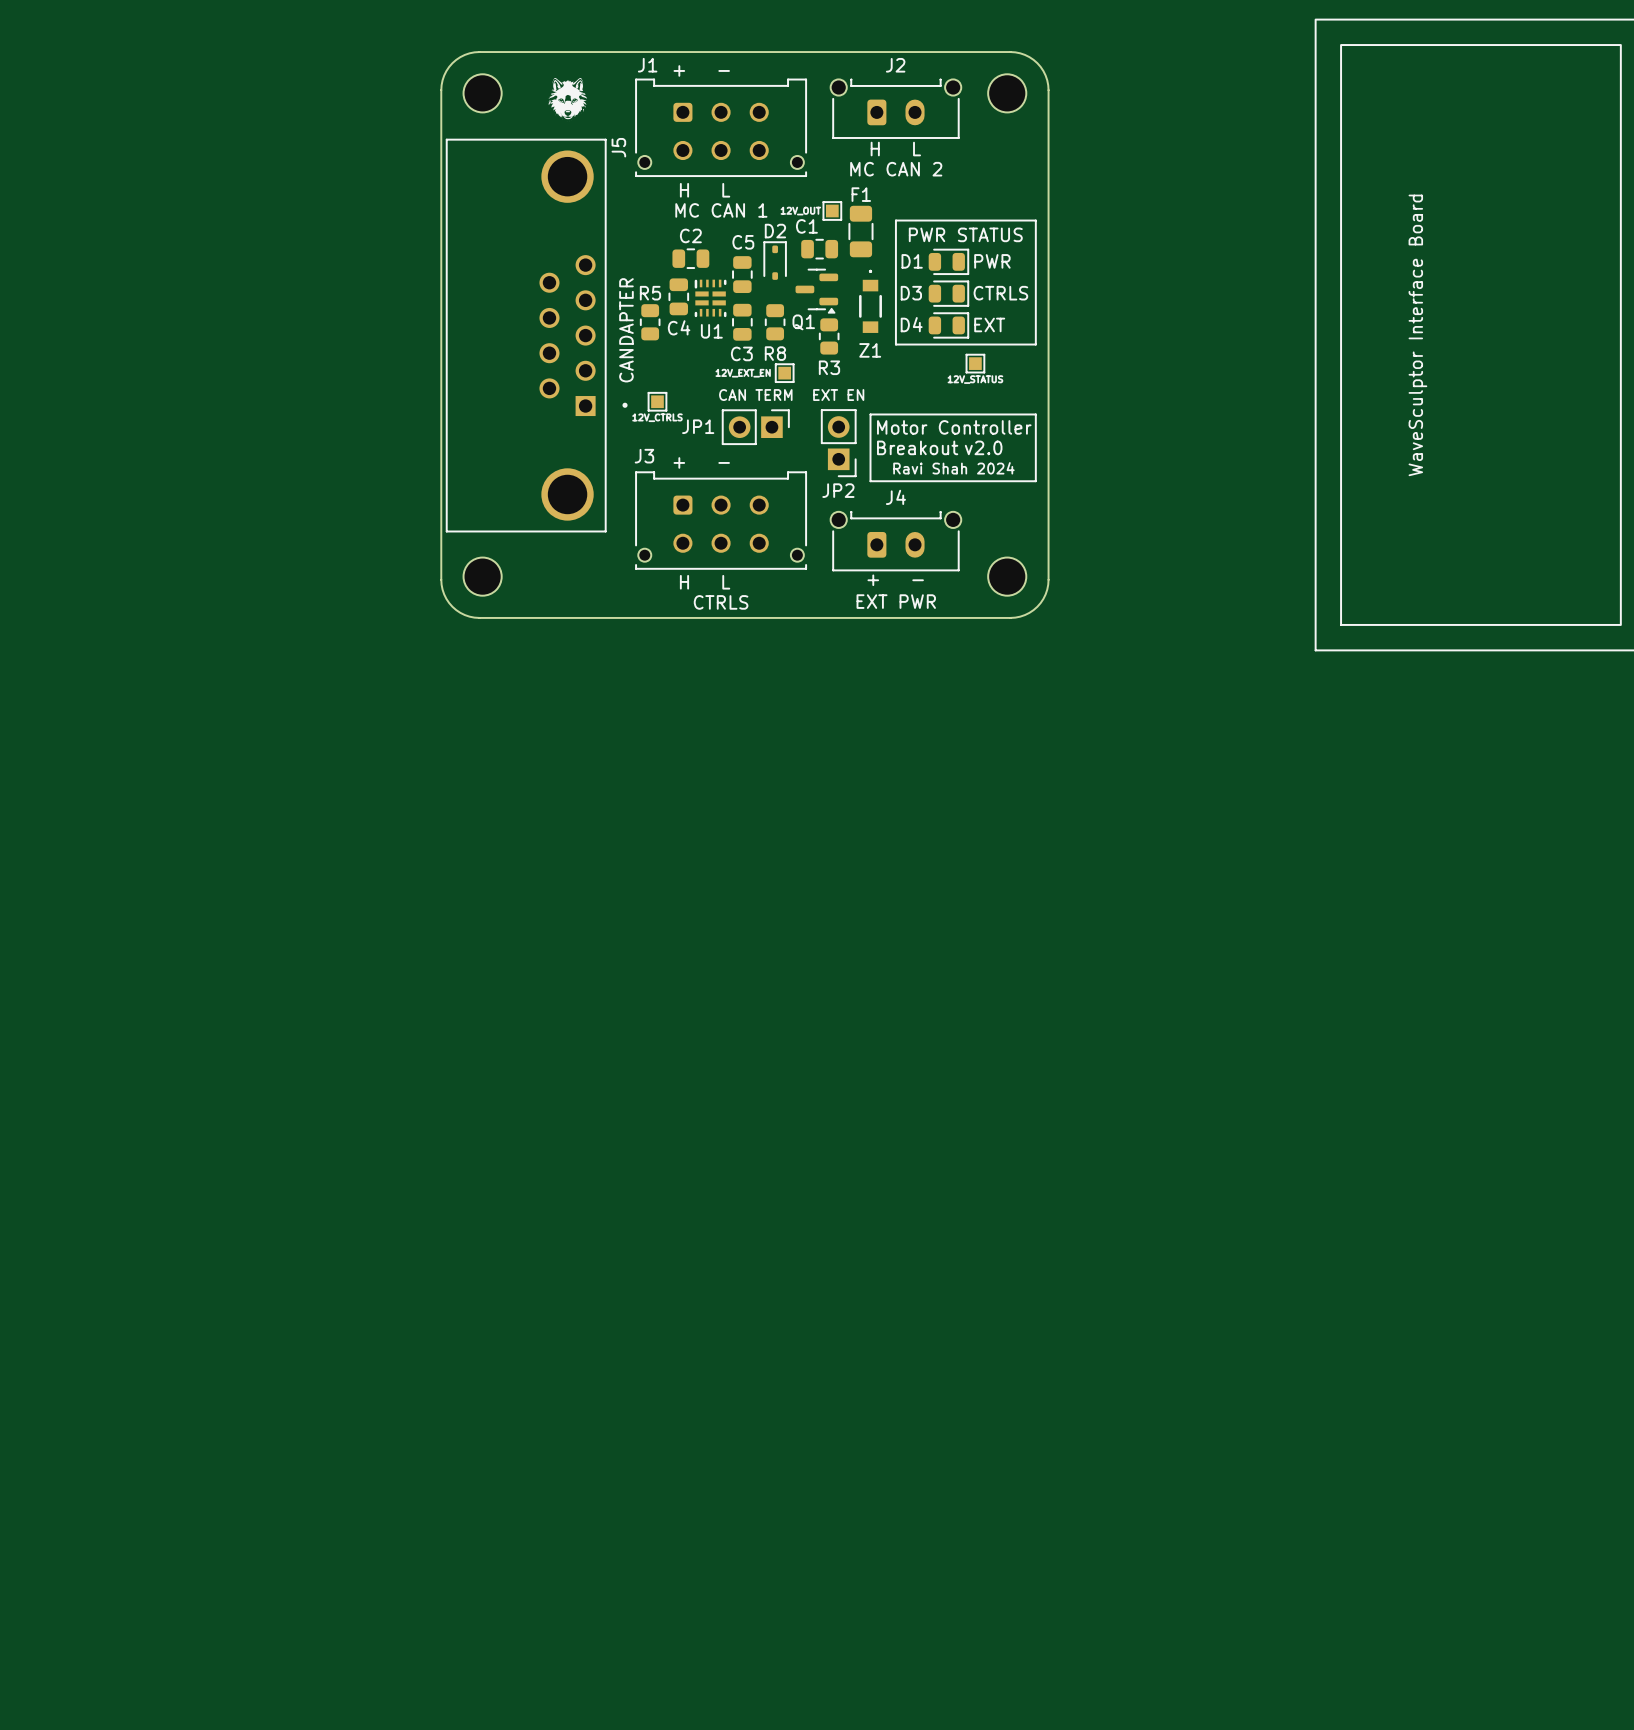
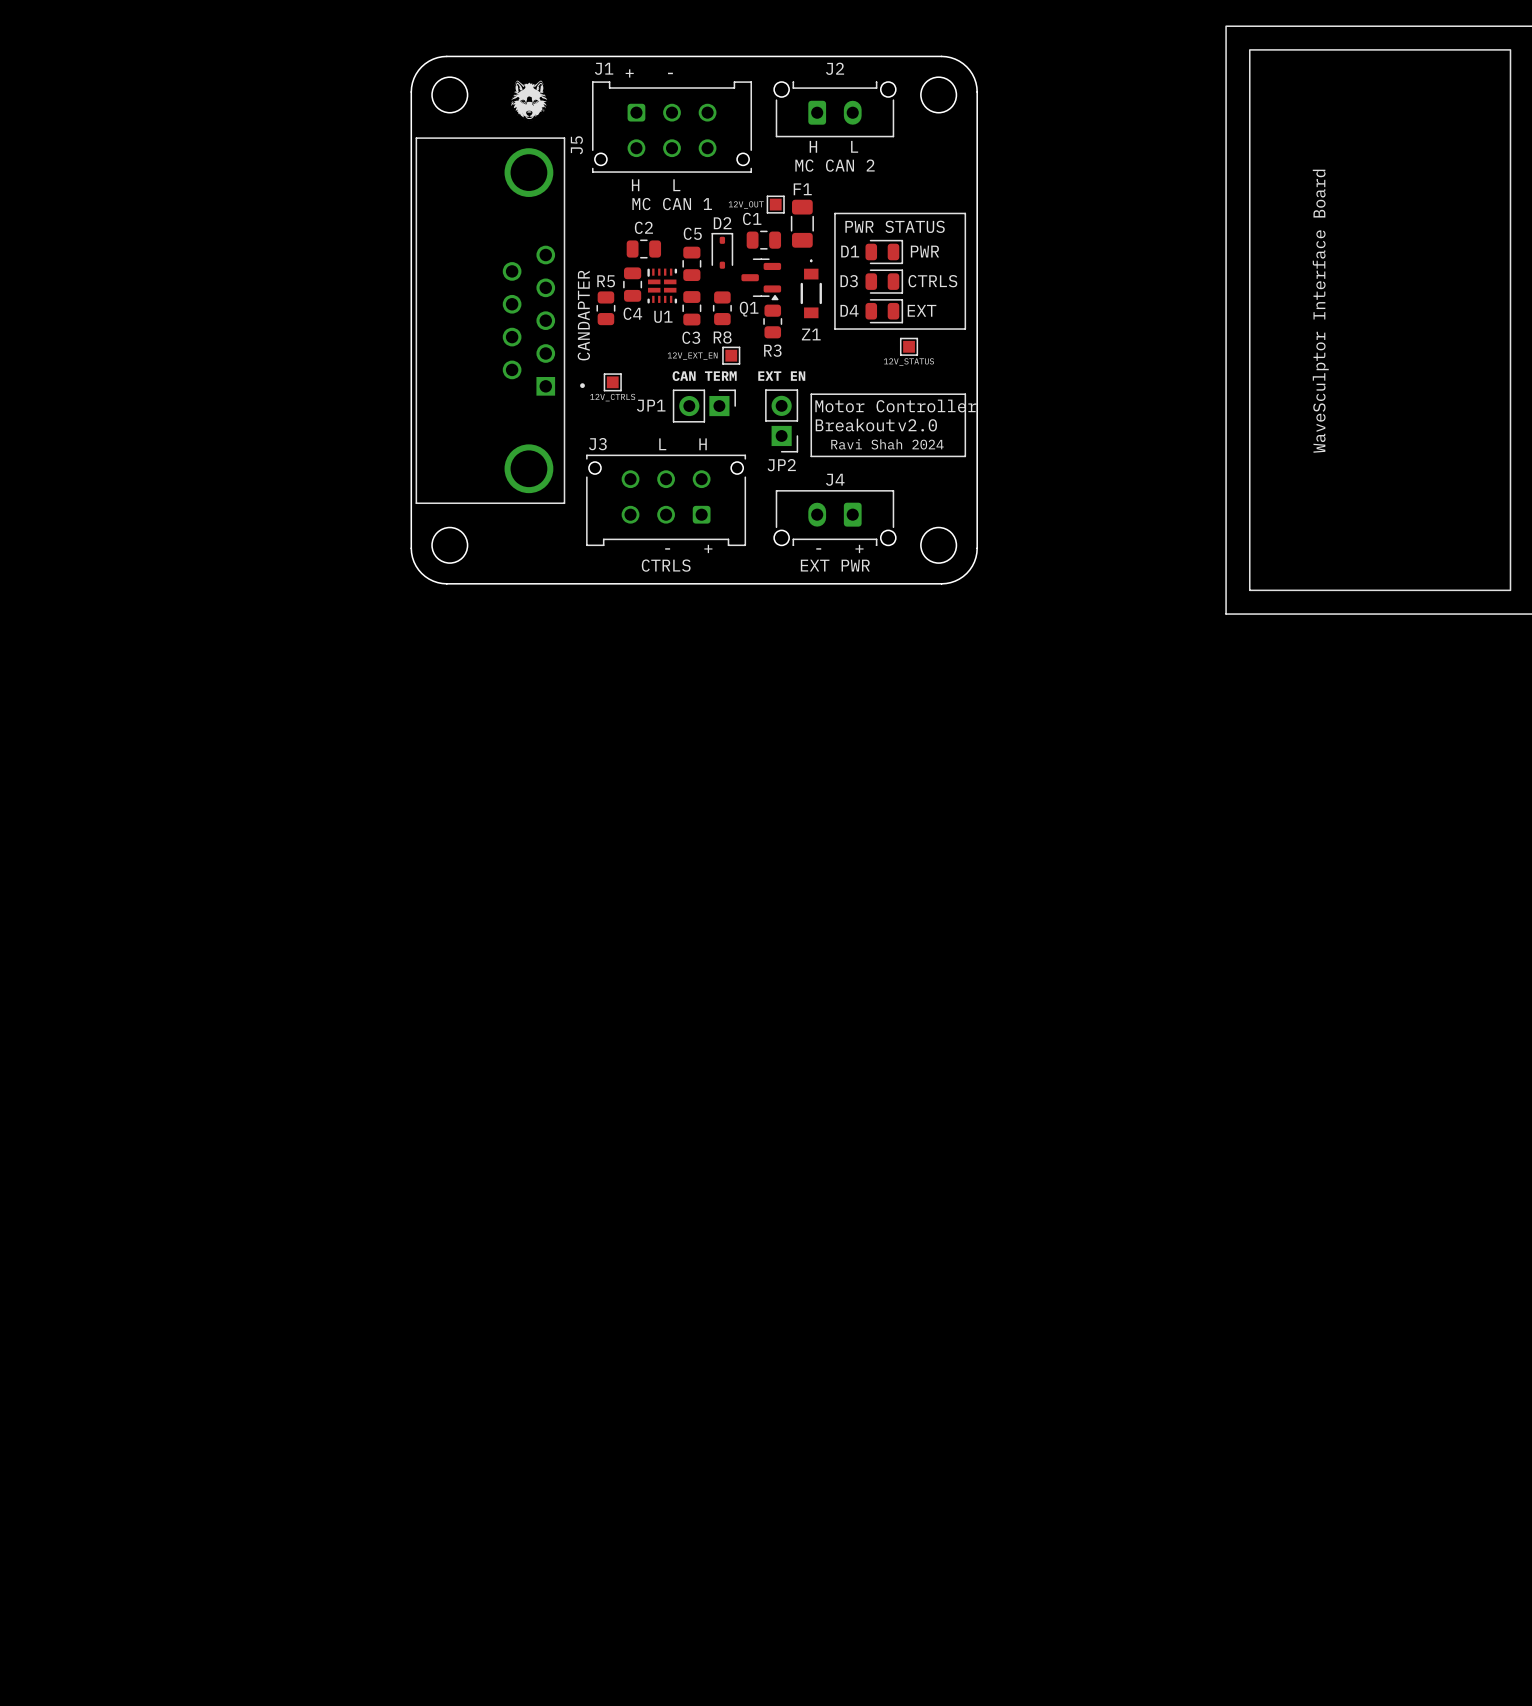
text: + - (701, 462) -> none
text: none -> L H (683, 444)
J3 rotation: 0° (721, 520) -> 180° (666, 500)
J4 rotation: 0° (895, 541) -> 180° (834, 518)
text: none -> + - (688, 548)
text rotation: 0° (895, 580) -> 180° (839, 548)
text: H L (705, 582) -> none

